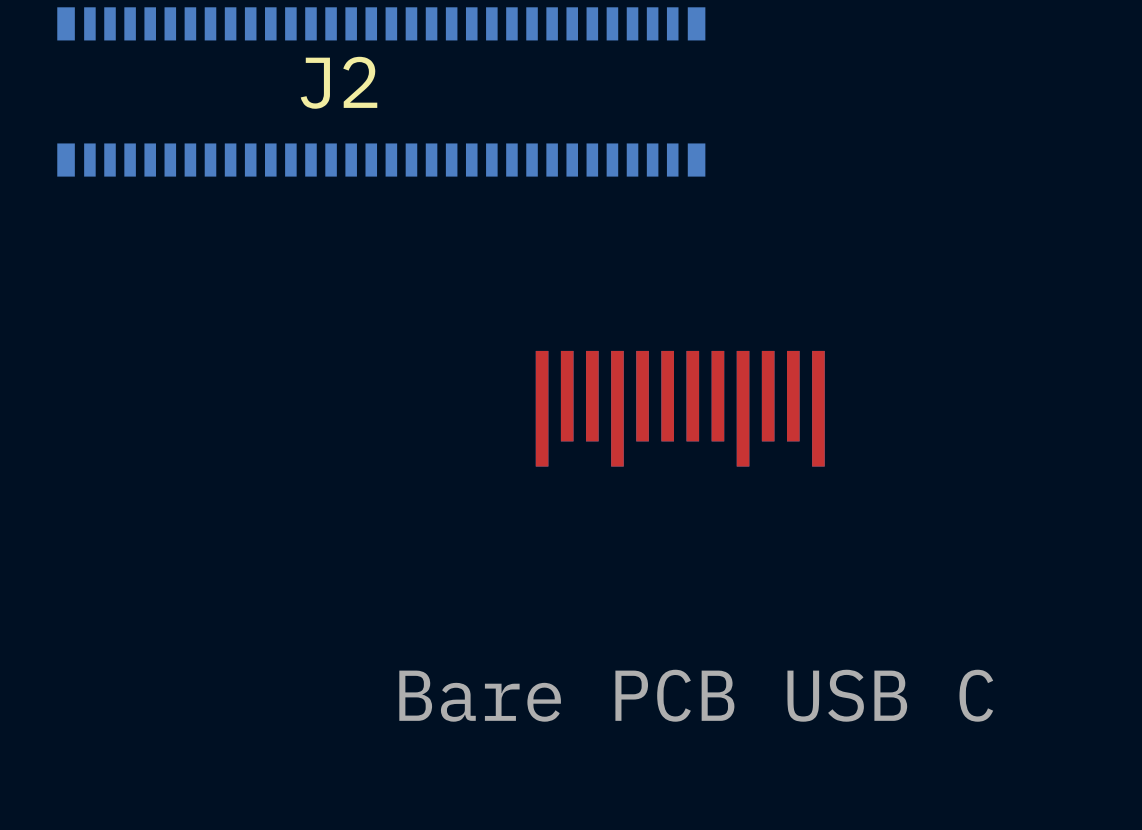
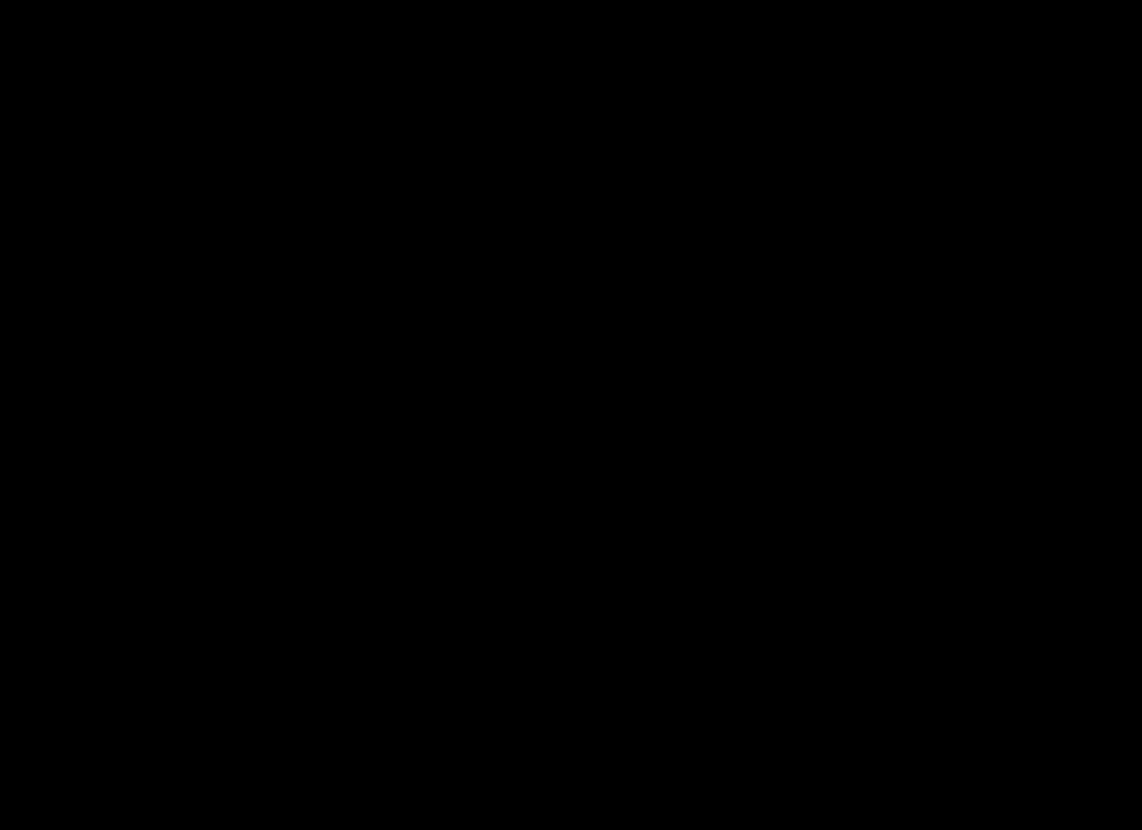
part: (381, 91) -> none
J2: Bare PCB USB C (680, 408) -> none

